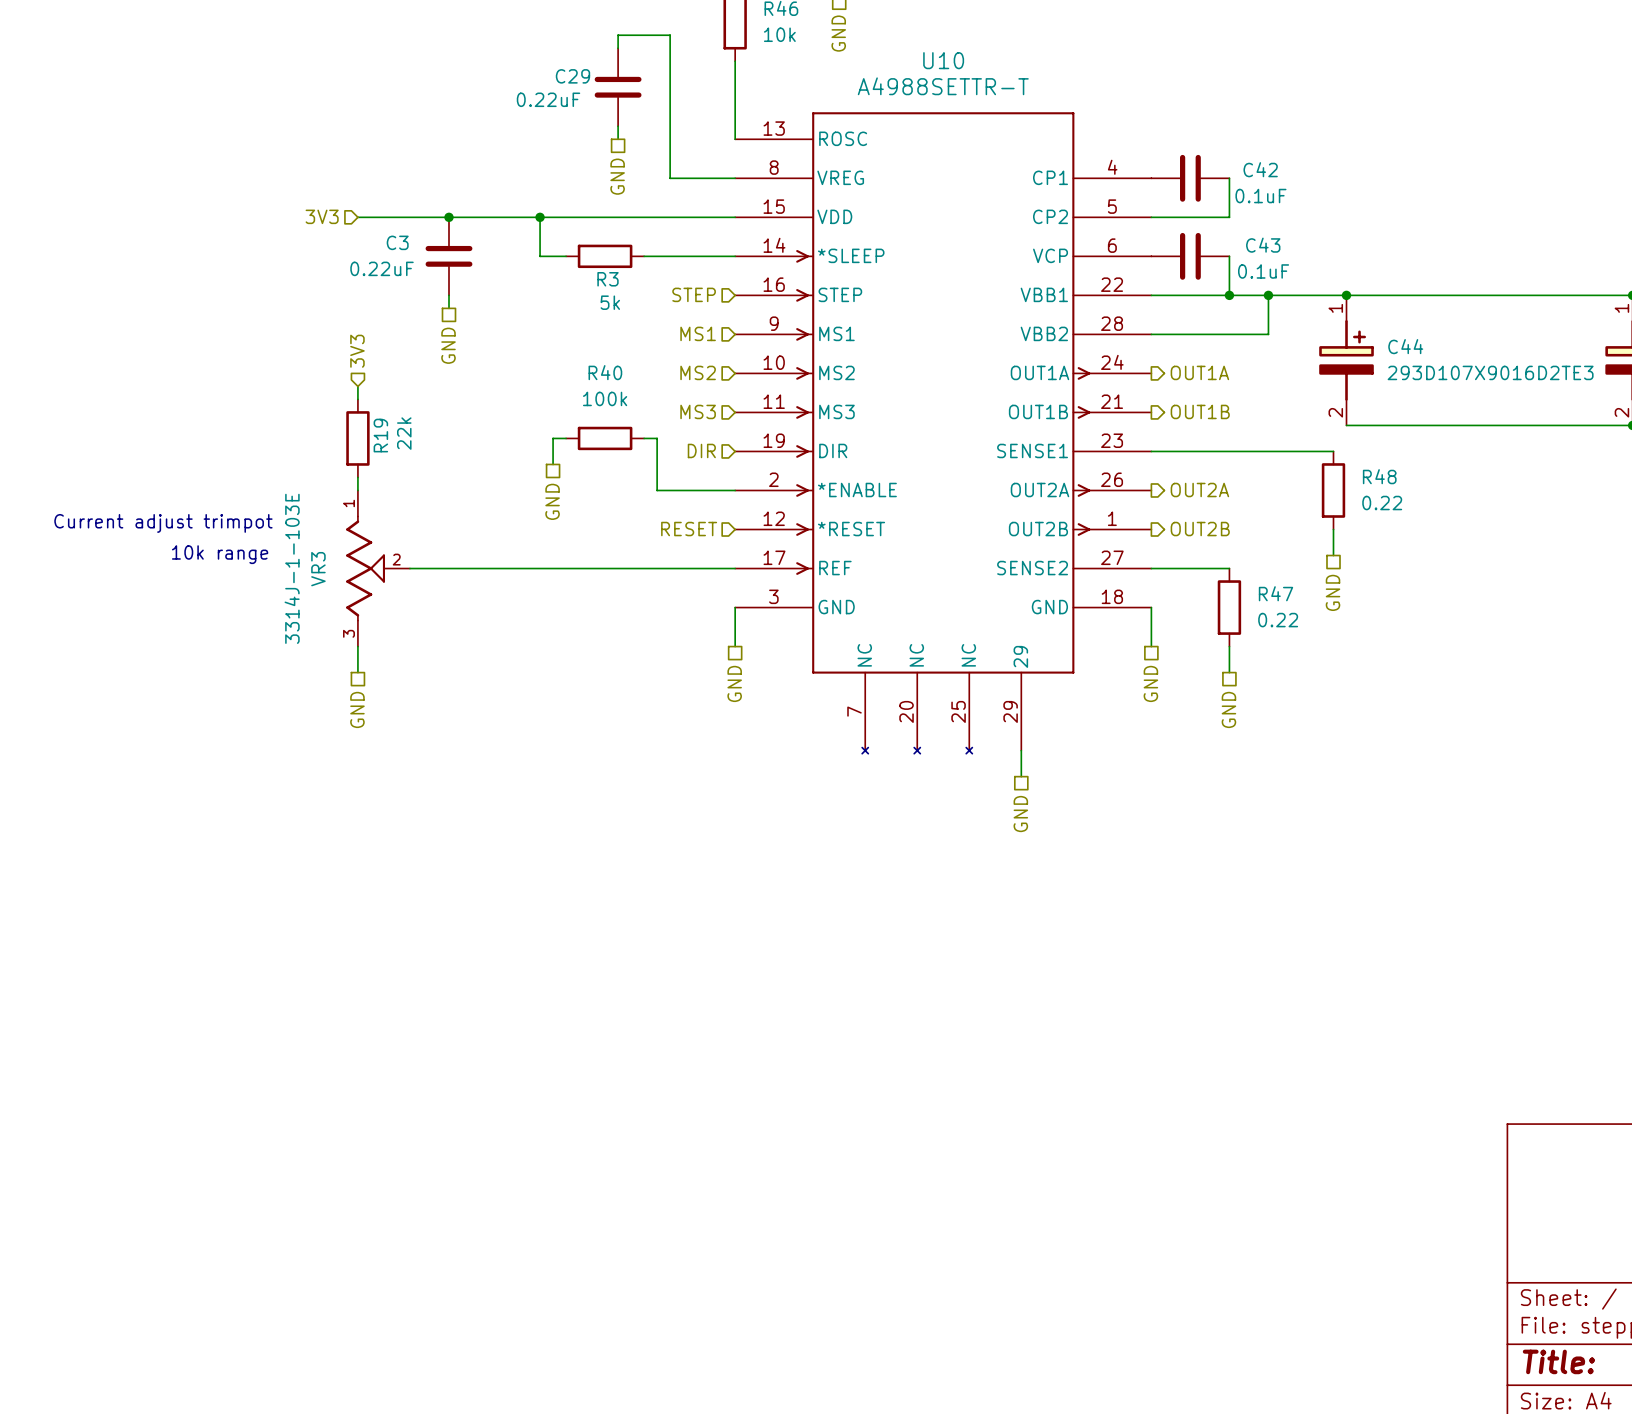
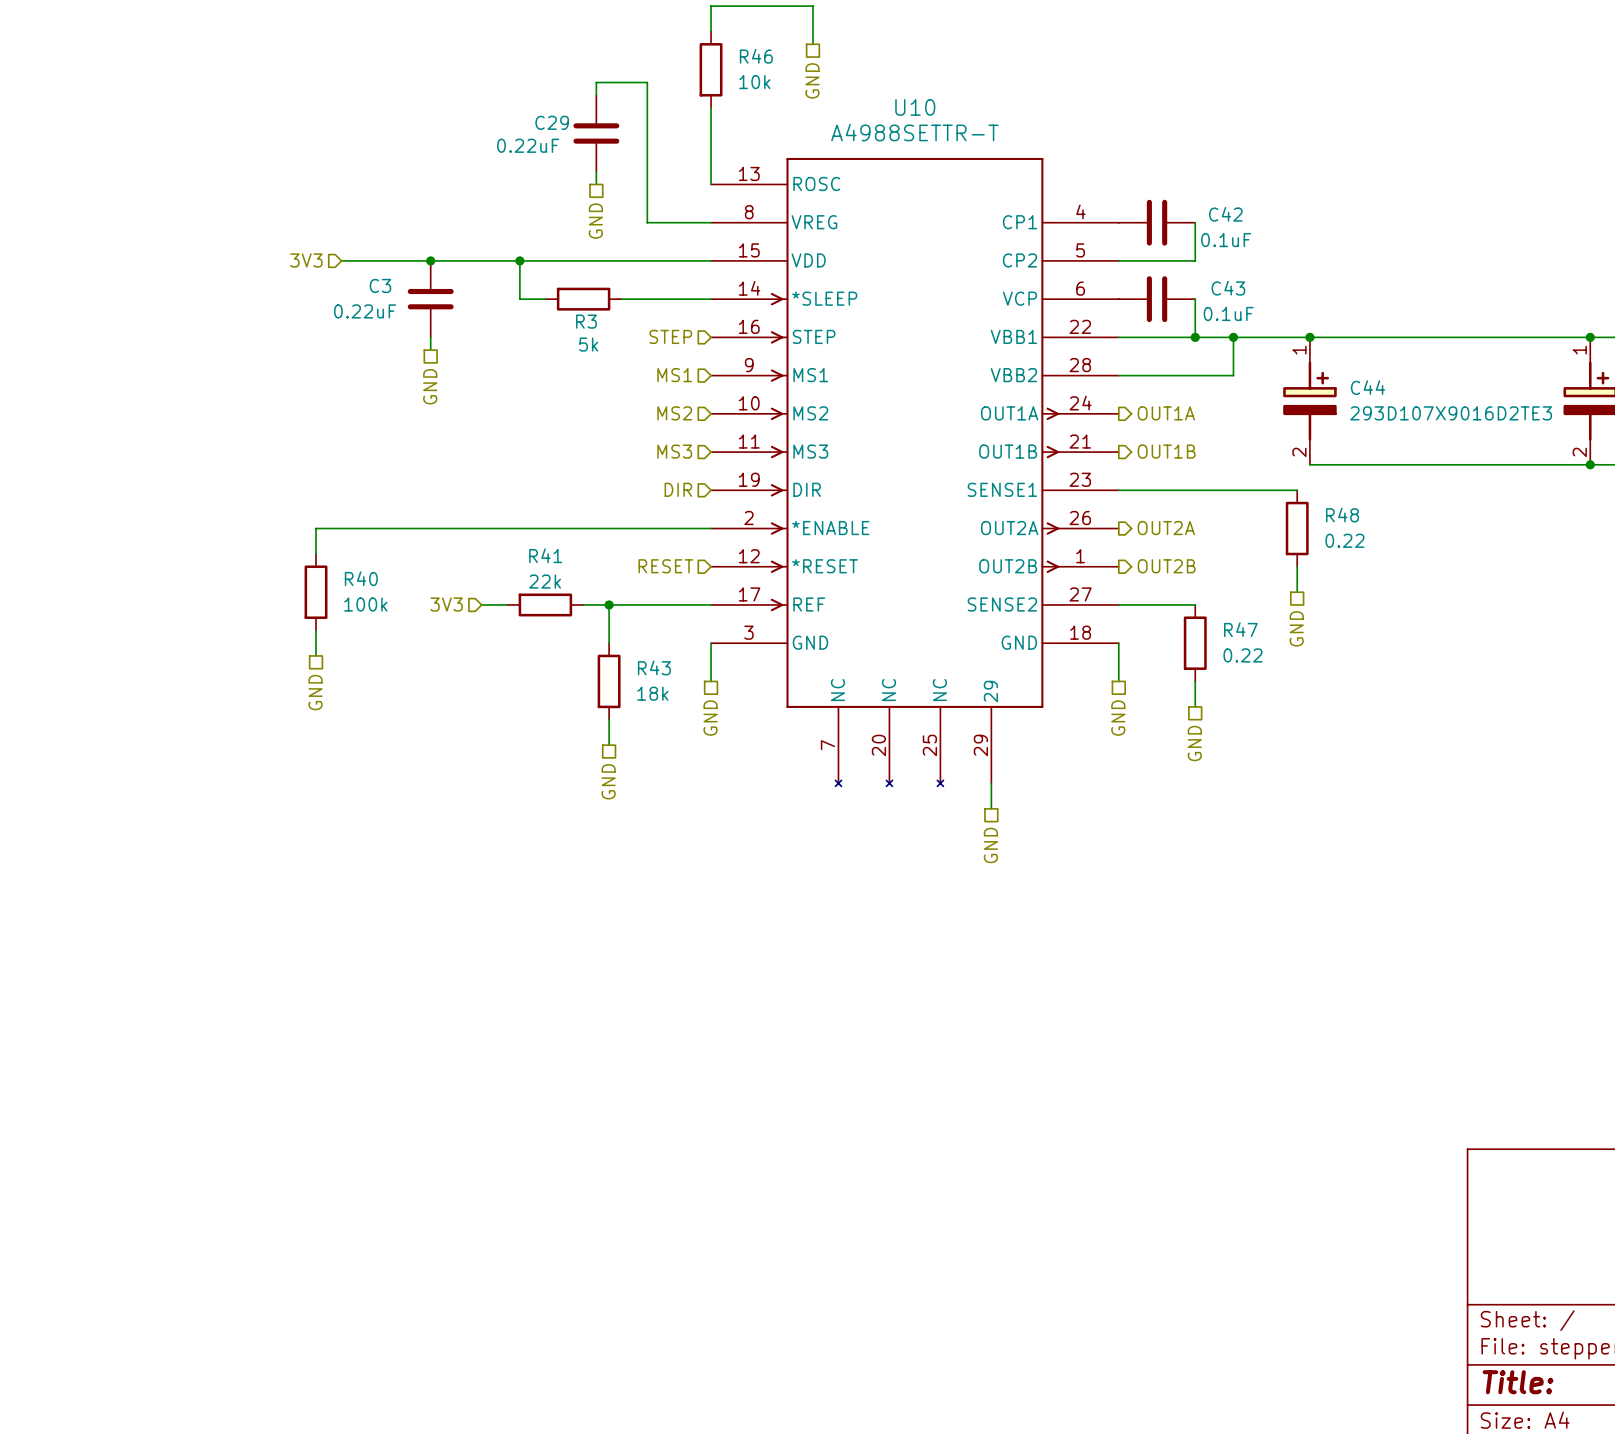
hierarchical label rotation: 0° (357, 351) -> 90° counterclockwise (446, 604)
hierarchical label position: 3V3 (357, 351) -> 3V3 (446, 604)
R40 name position: R40 (605, 372) -> R40 (361, 578)
wire: (357, 386) (357, 399) -> none
R19: 22k (357, 438) -> none
wire: (566, 438) (553, 438) (553, 464) -> none
R40 rotation: 0° (605, 438) -> 90° clockwise (316, 592)
R40 position: (605, 438) -> (316, 592)
wire: (644, 438) (657, 438) (657, 490) -> (316, 554) (316, 528) (634, 528)
wire: (357, 477) (357, 490) -> none
hierarchical label: GND (552, 501) -> none
text: Current adjust trimpot (163, 523) -> none
text: 10k range (220, 554) -> none
VR3: 3314J-1-103E (378, 568) -> none
wire: (409, 568) (501, 568) -> none
wire: (527, 568) (605, 568) -> none
R41: none -> 22k (545, 604)
wire: none -> (609, 604) (609, 643)
junction: none -> (609, 604)
wire: (357, 646) (357, 672) -> (316, 630) (316, 655)
R43: none -> 18k (609, 681)
wire: none -> (609, 719) (609, 745)
hierarchical label position: GND (357, 709) -> GND (315, 692)
hierarchical label: none -> GND (608, 781)

